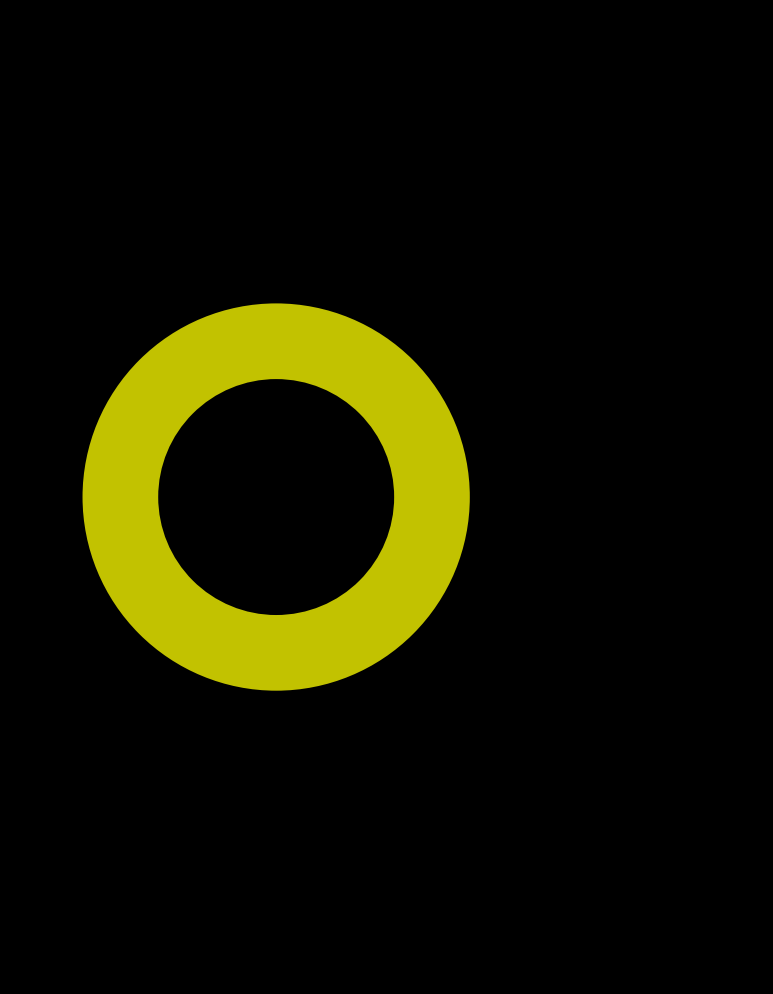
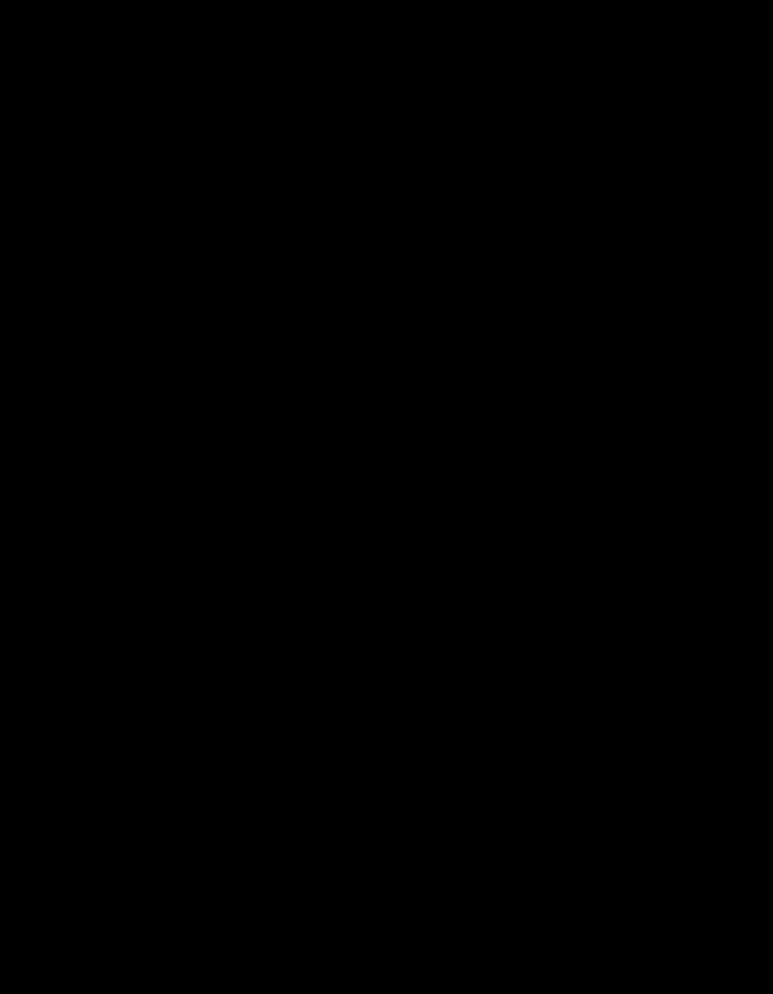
part: (276, 497) -> none

